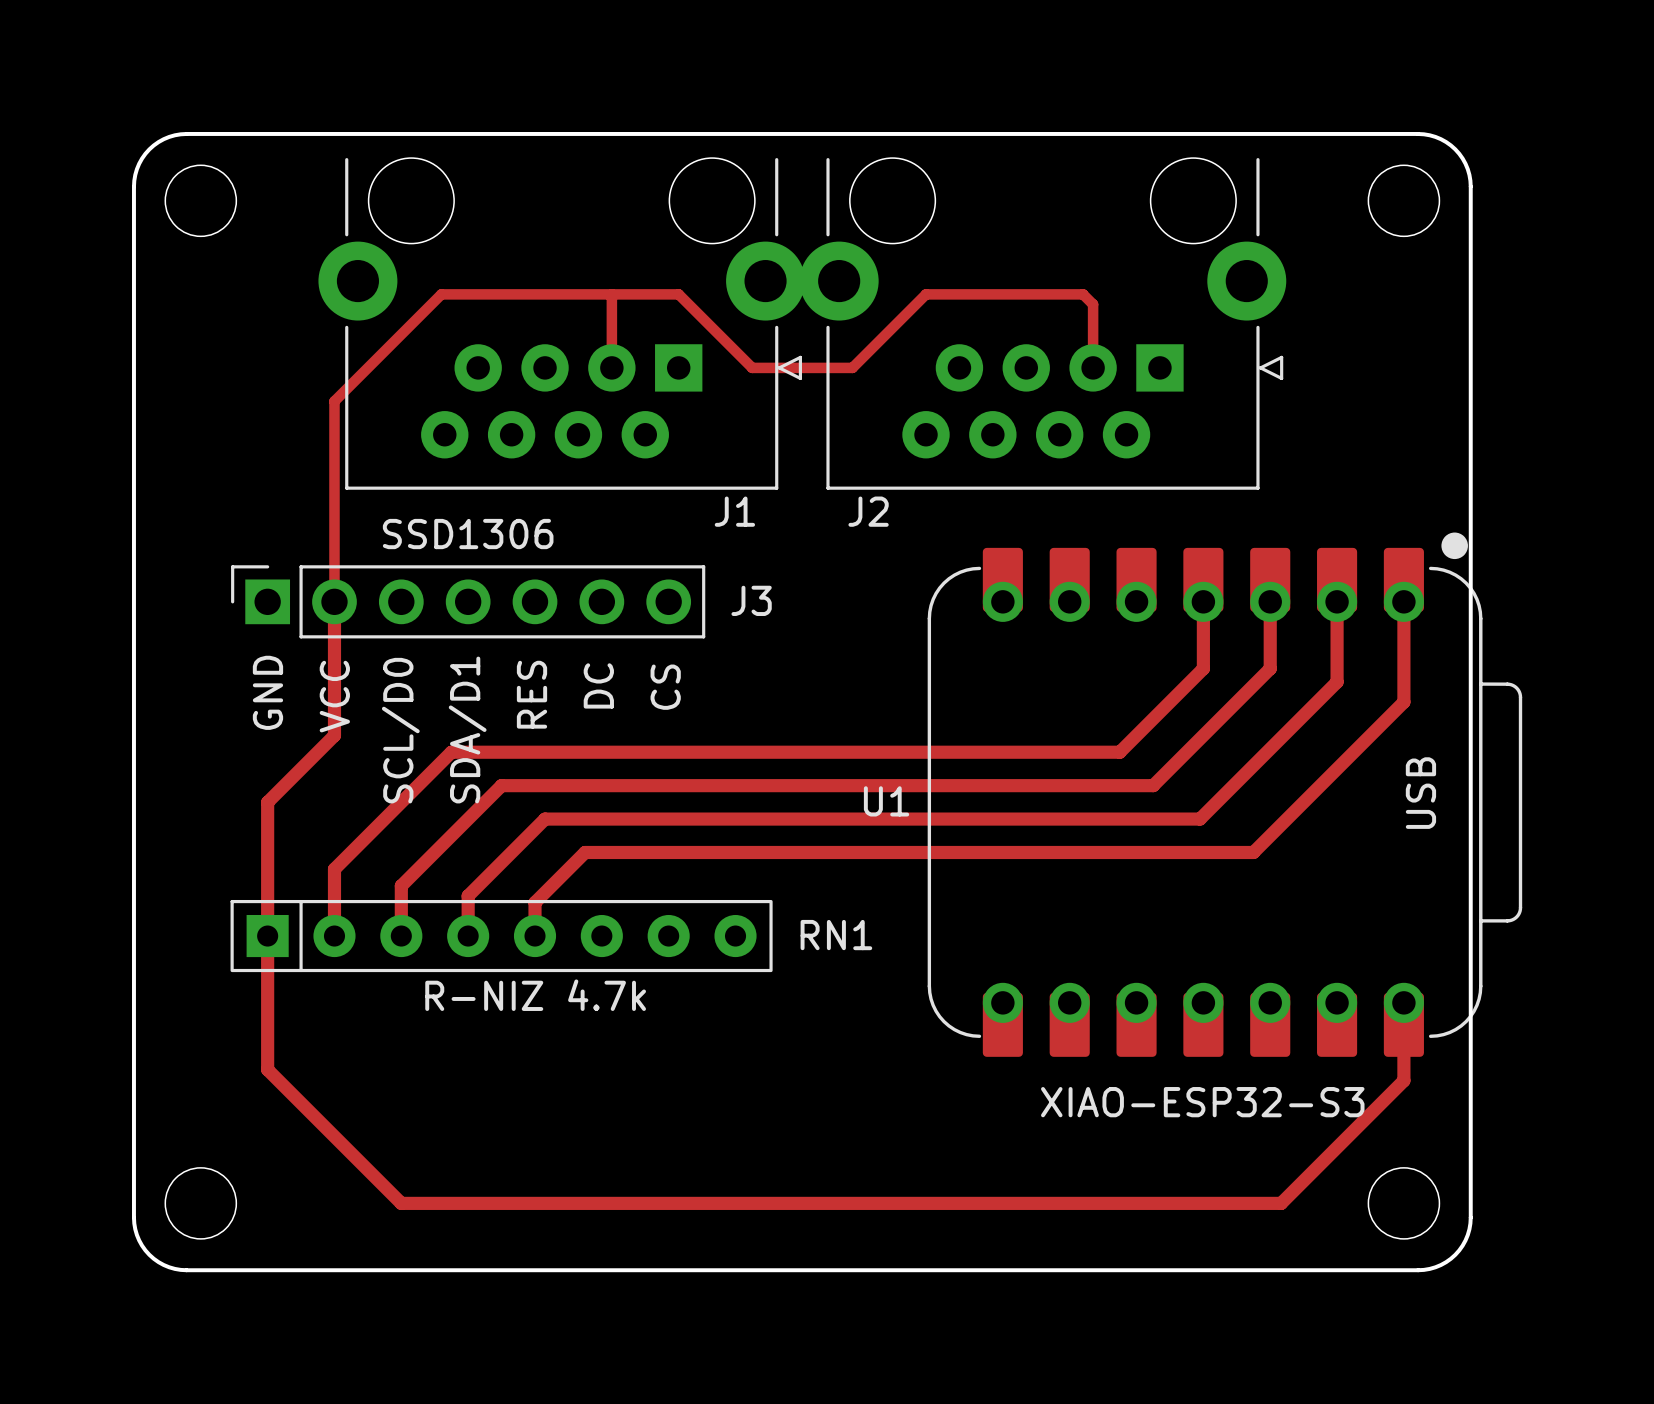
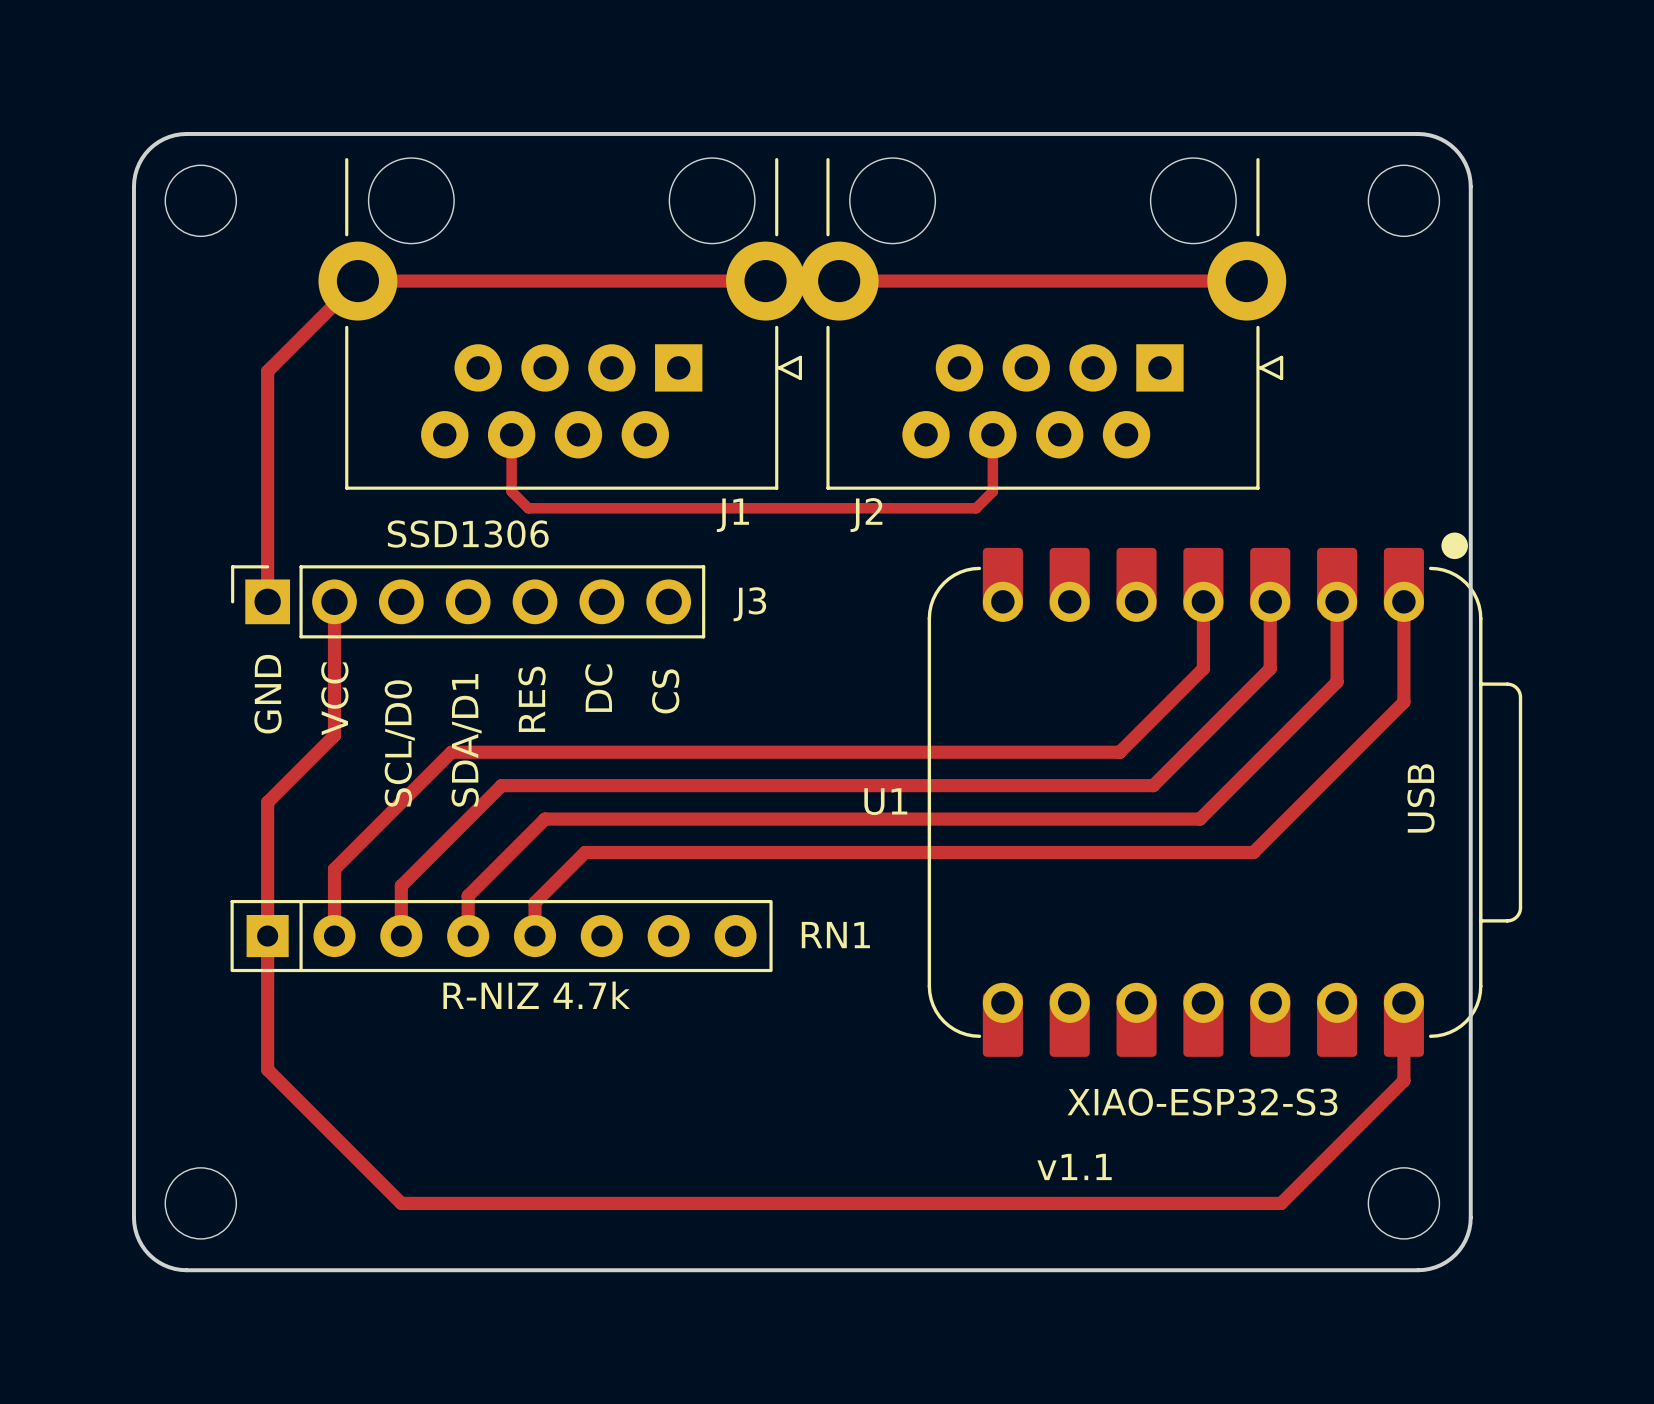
track: none -> (1246, 281) (357, 281) (267, 371) (267, 601)
track: (611, 294) (611, 367) -> none
track: (1093, 367) (1093, 304) (1083, 294) (926, 294) (852, 367) (752, 367) (678, 294) (441, 294) (334, 401) (334, 601) -> none
track: none -> (511, 434) (511, 491) (528, 508) (976, 508) (992, 491) (992, 434)
text: none -> v1.1 (1074, 1166)

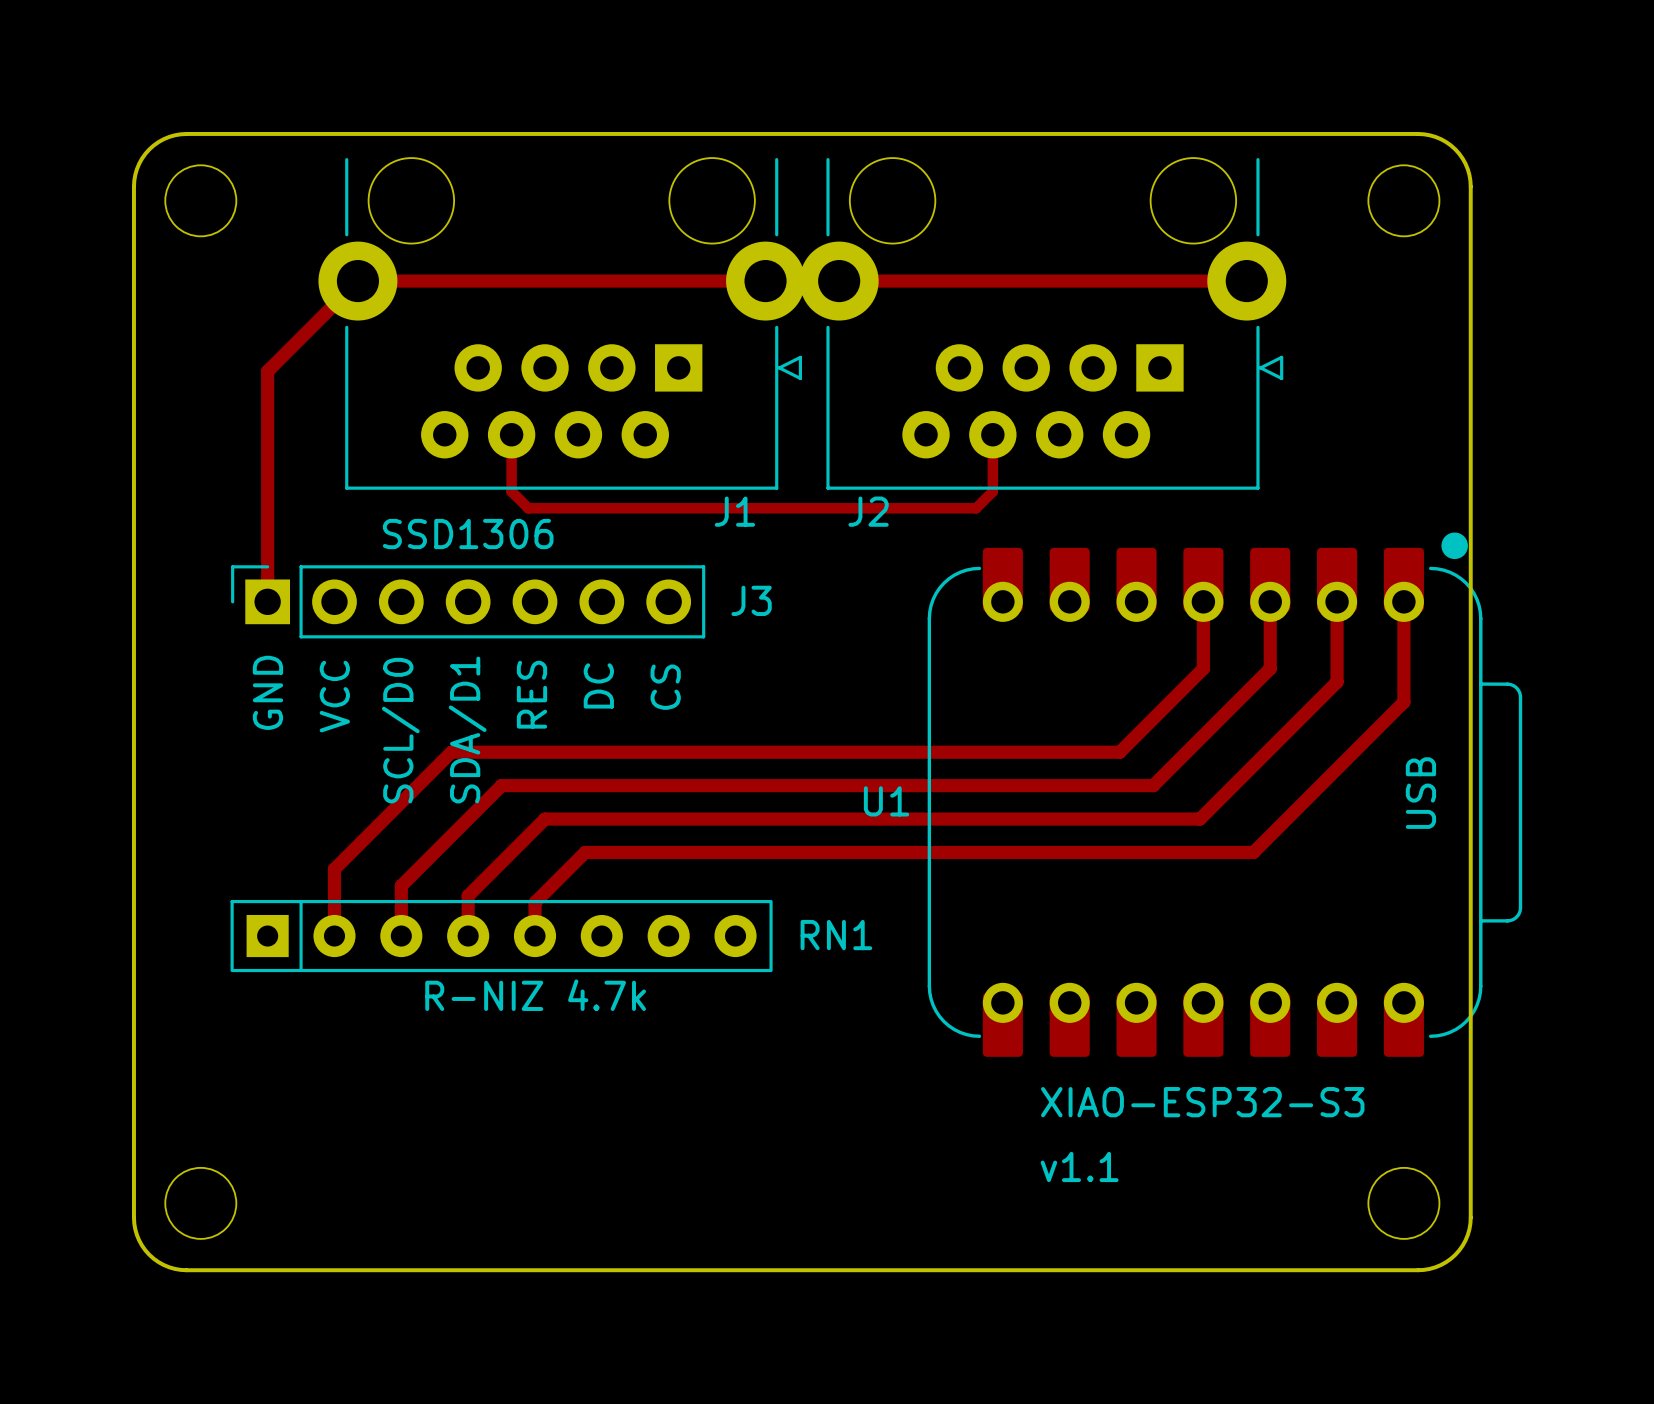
track: (334, 601) (334, 735) (267, 802) (267, 1069) (401, 1203) (1281, 1203) (1403, 1080) (1403, 1024) -> none

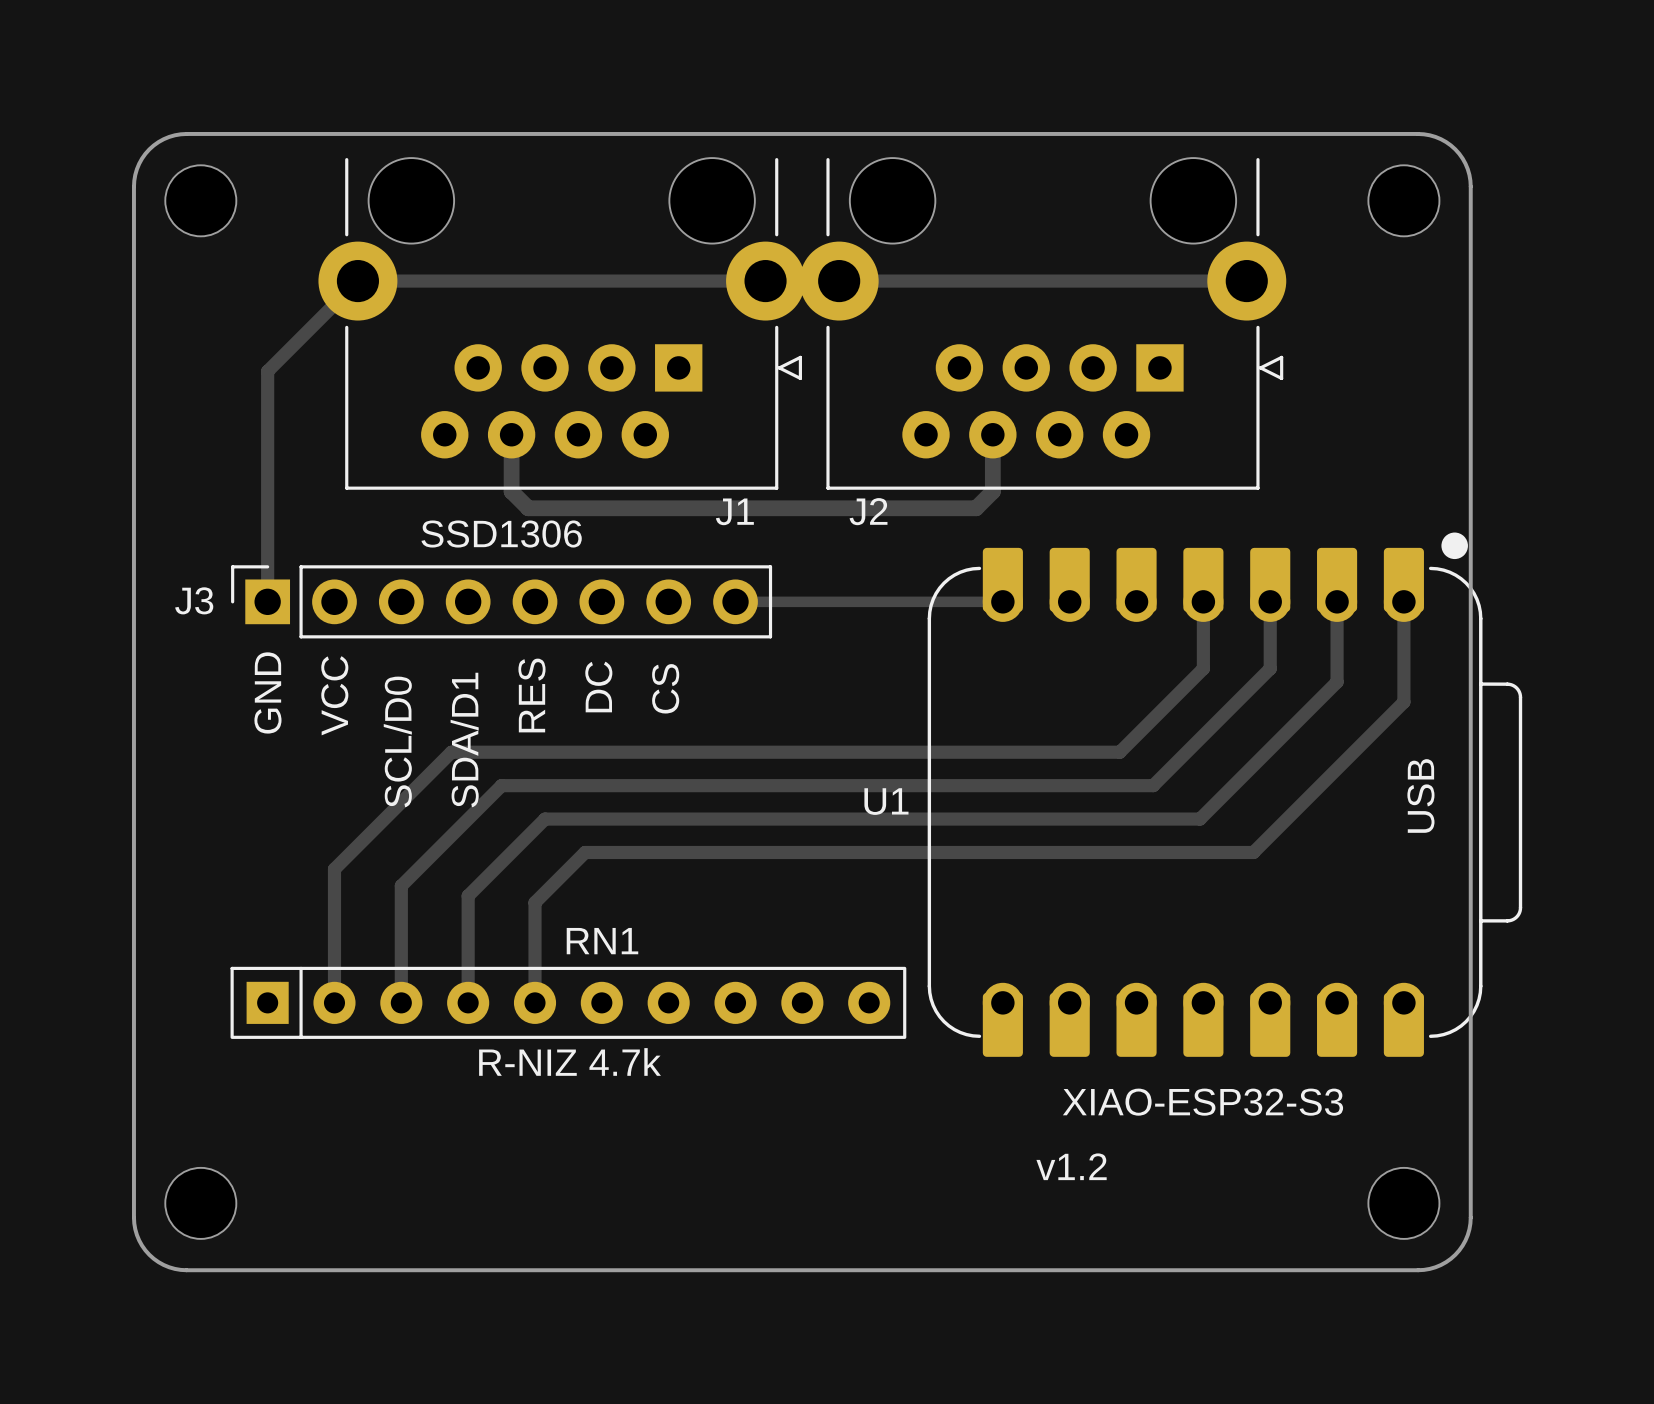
track width: thin (511, 434) (511, 491) (528, 508) (976, 508) (992, 491) (992, 434) -> thick (511, 434) (511, 491) (528, 508) (976, 508) (992, 491) (992, 434)
J3 footprint: [231, 565, 706, 639] -> [231, 565, 773, 639]
J3 name position: J3 (751, 600) -> J3 (194, 600)
track: none -> (735, 601) (1002, 601)
RN1 footprint: [230, 899, 773, 973] -> [230, 966, 907, 1039]
RN1 name position: RN1 (836, 935) -> RN1 (602, 941)
track: none -> (334, 936) (334, 1002)
track: none -> (401, 936) (401, 1002)
track: none -> (468, 936) (468, 1002)
track: none -> (535, 936) (535, 1002)
text: v1.1 (1079, 1166) -> v1.2 (1071, 1166)

